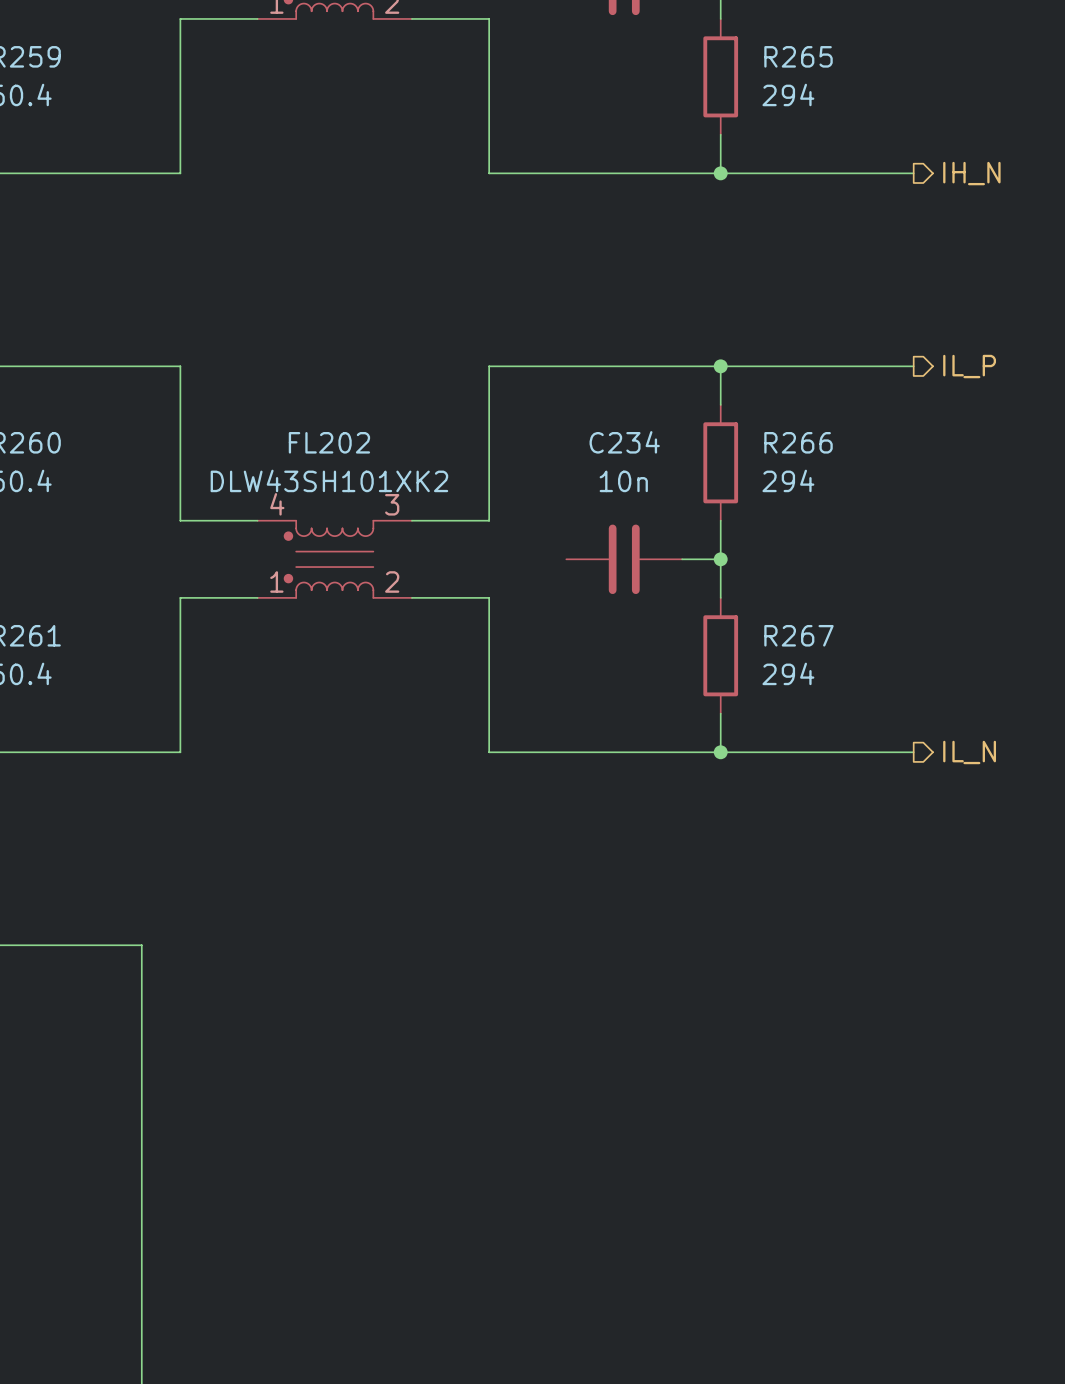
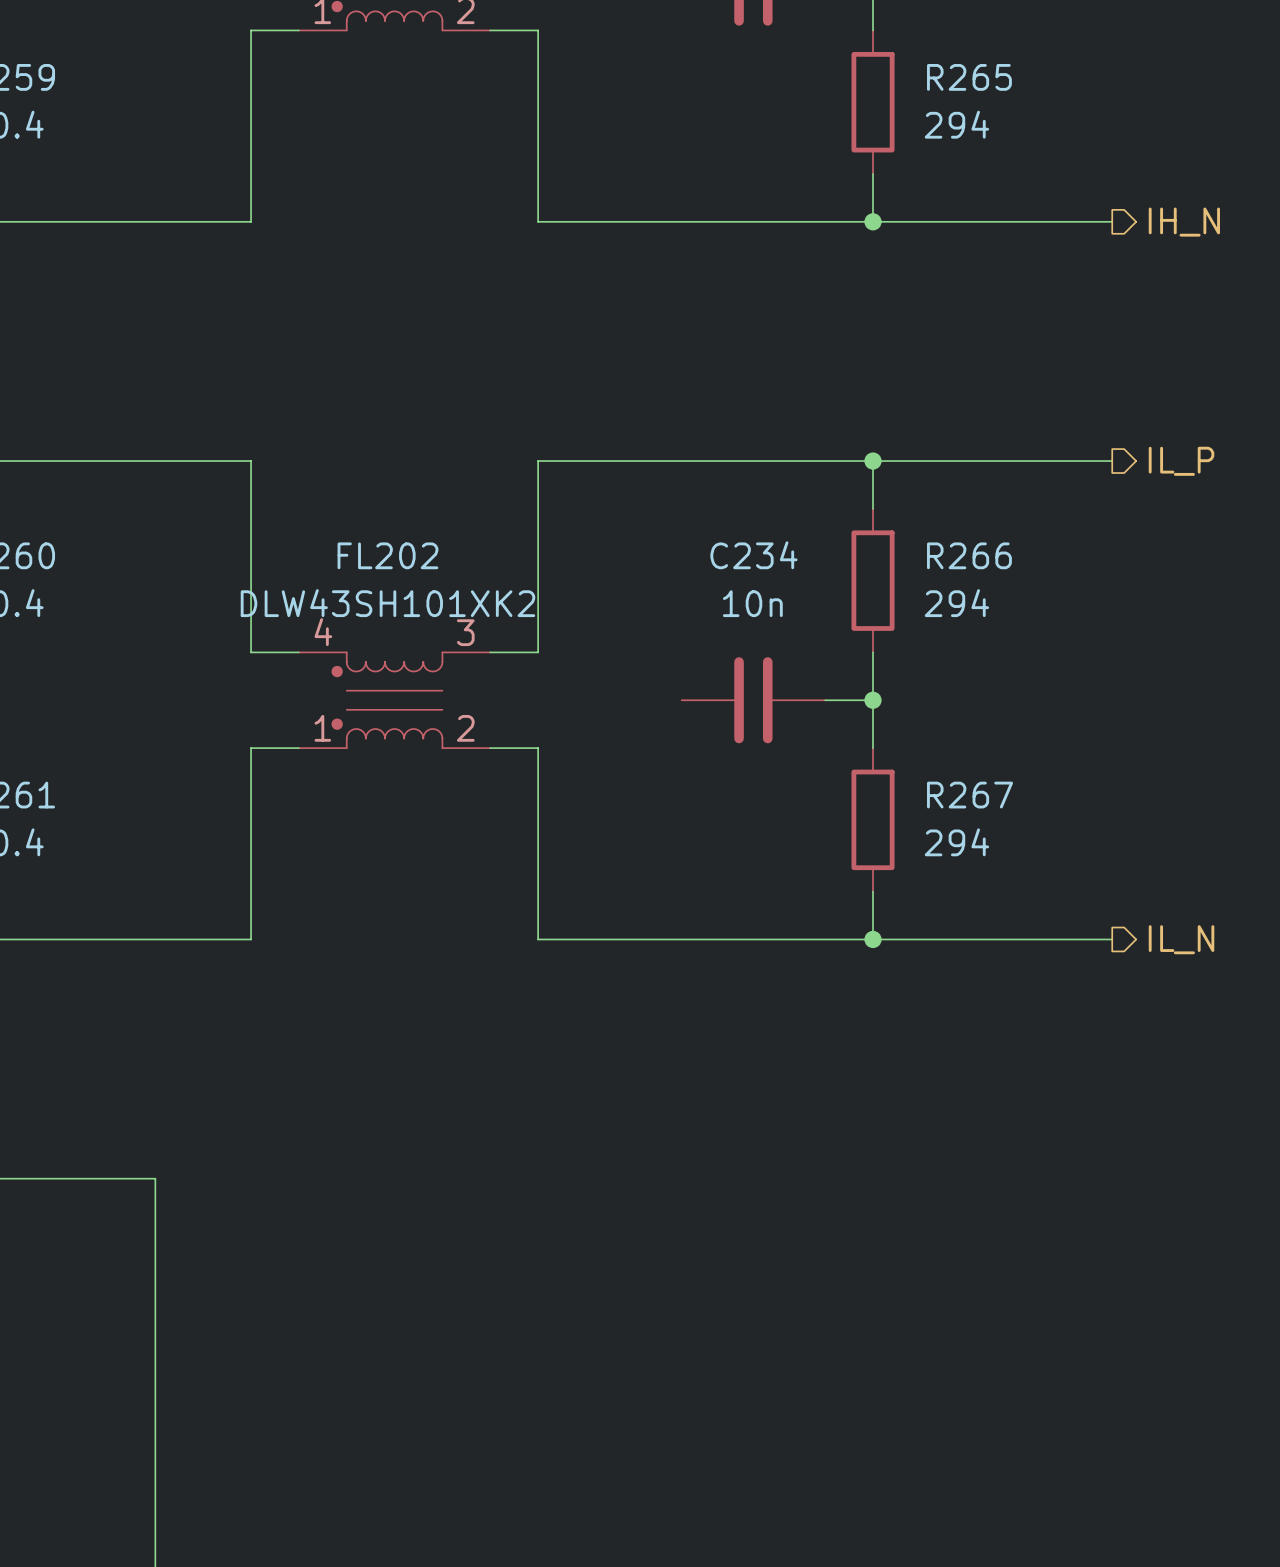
wire: (218, 18) (180, 18) (180, 173) -> (251, 30) (251, 221) (203, 221)
wire: (450, 18) (489, 18) (489, 173) -> (538, 30) (538, 221) (585, 221)
wire: (180, 366) (180, 520) (218, 520) -> (203, 461) (251, 461) (251, 652)
wire: (489, 366) (489, 520) (450, 520) -> (585, 461) (538, 461) (538, 652)
wire: (218, 597) (180, 597) (180, 752) -> (251, 748) (251, 939) (203, 939)
wire: (450, 597) (489, 597) (489, 752) -> (538, 748) (538, 939) (585, 939)

